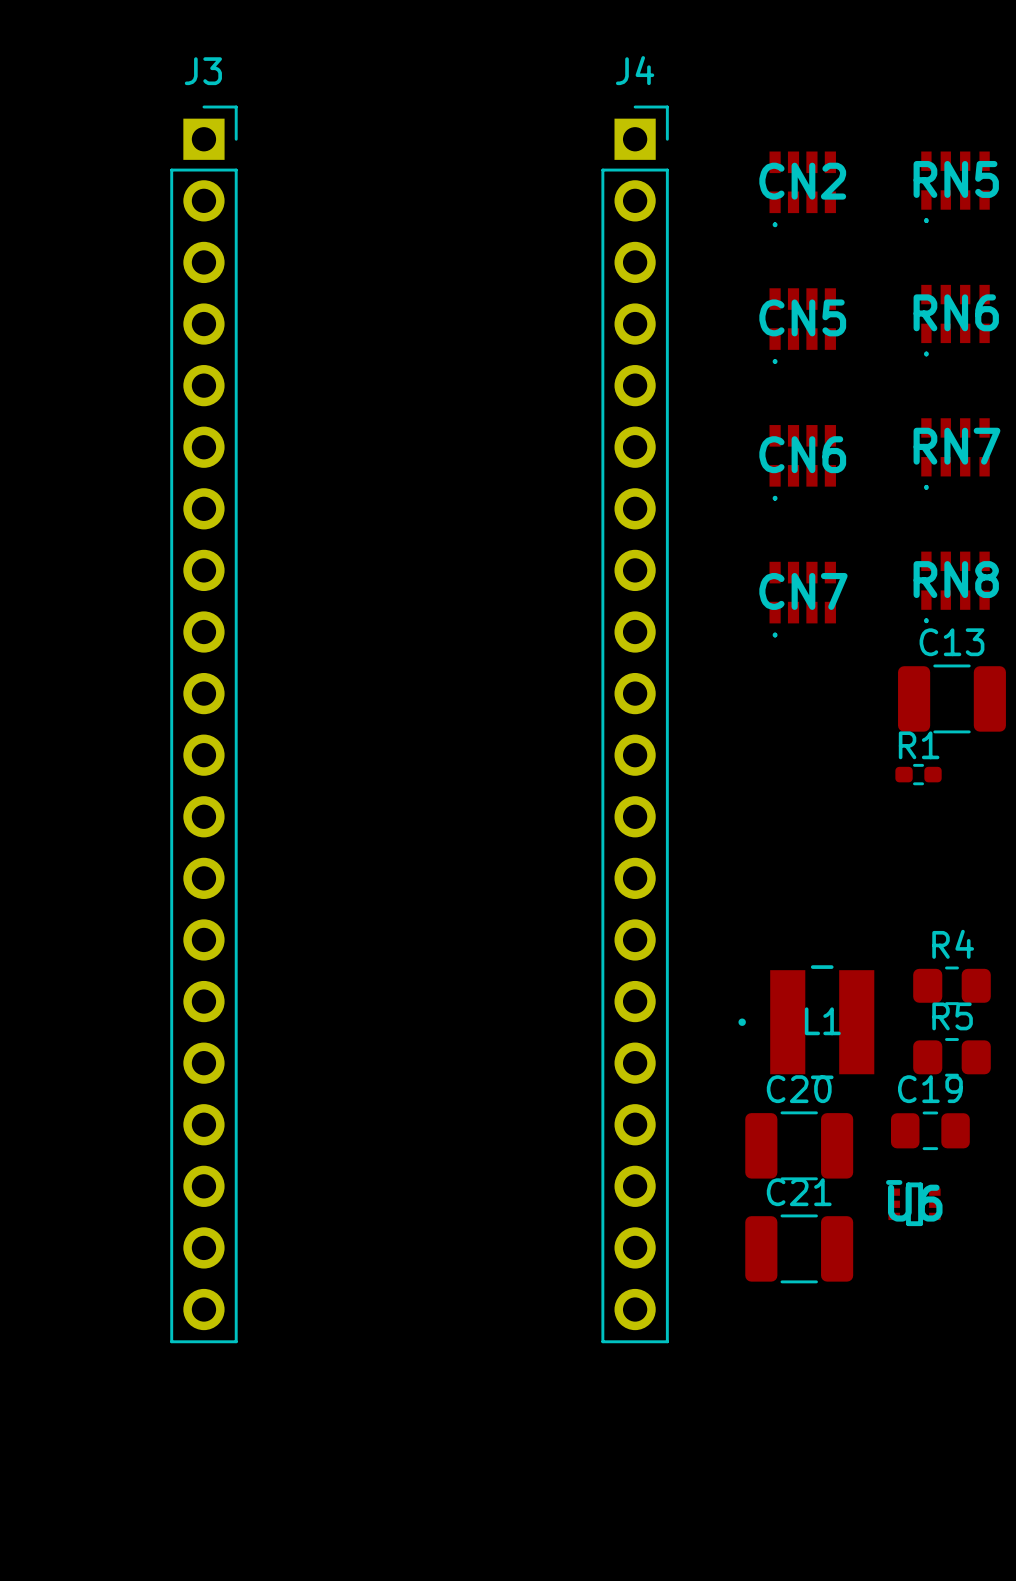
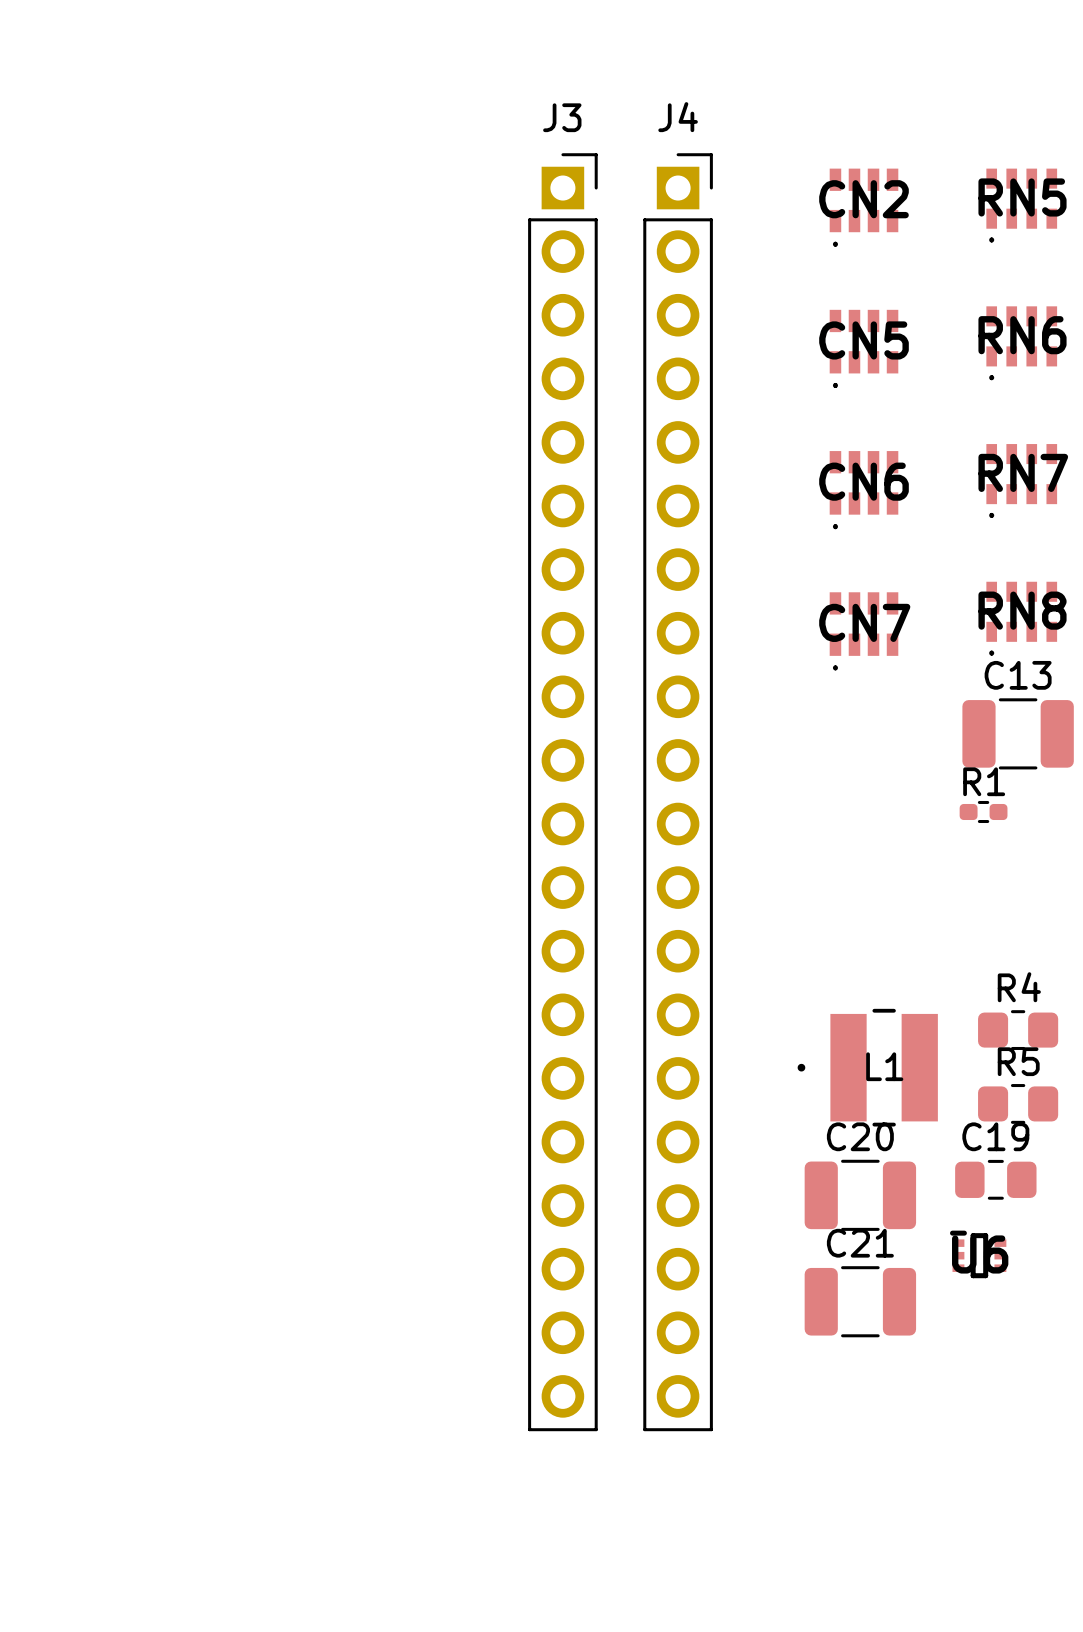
J3 position: (203, 724) -> (562, 792)
J4 position: (635, 724) -> (678, 792)

